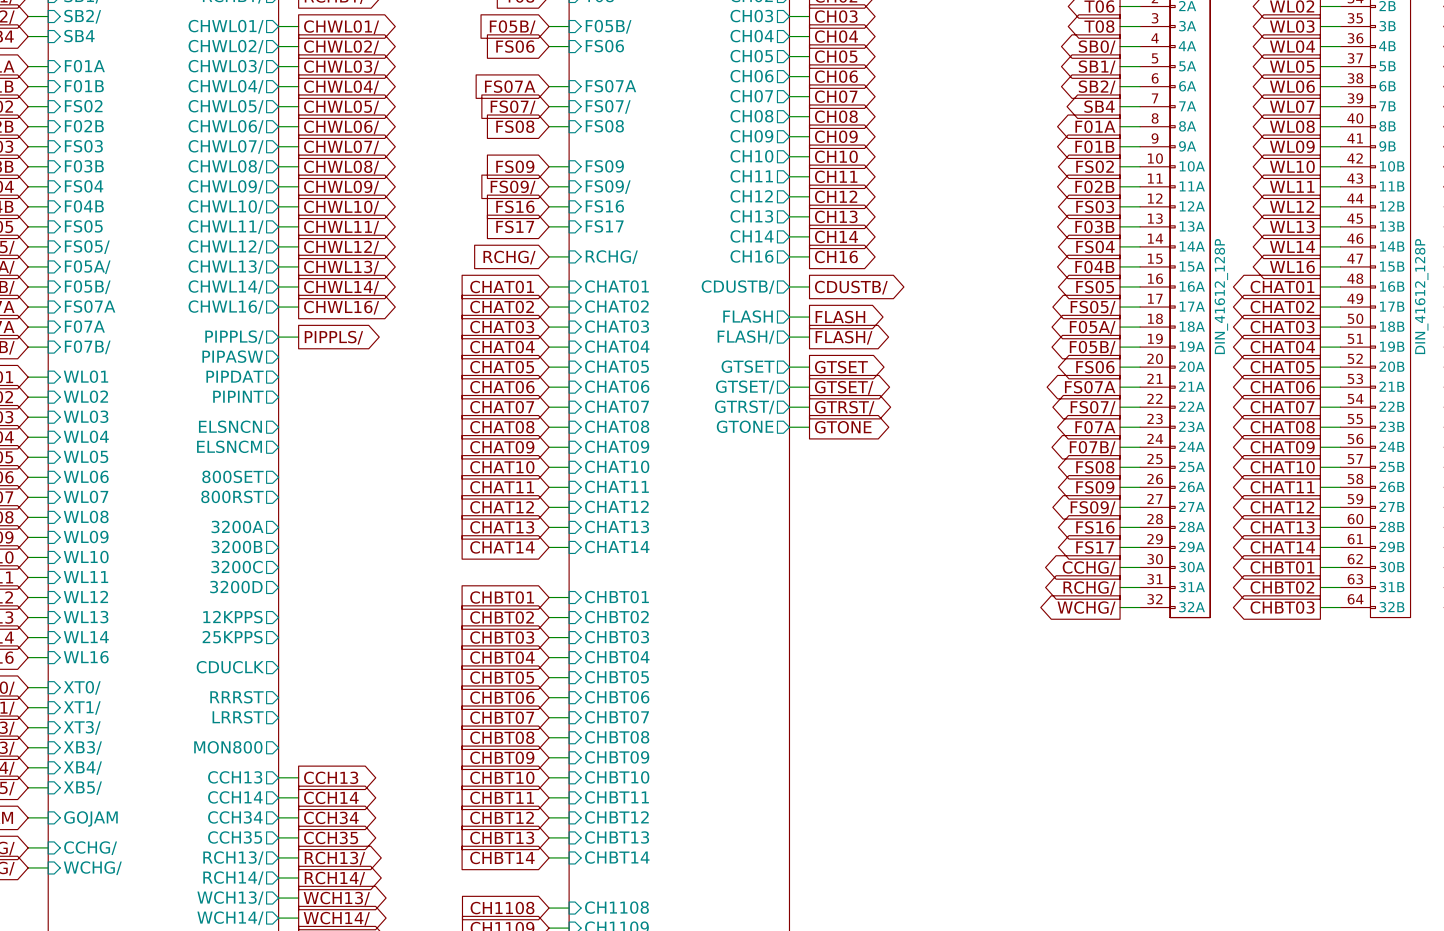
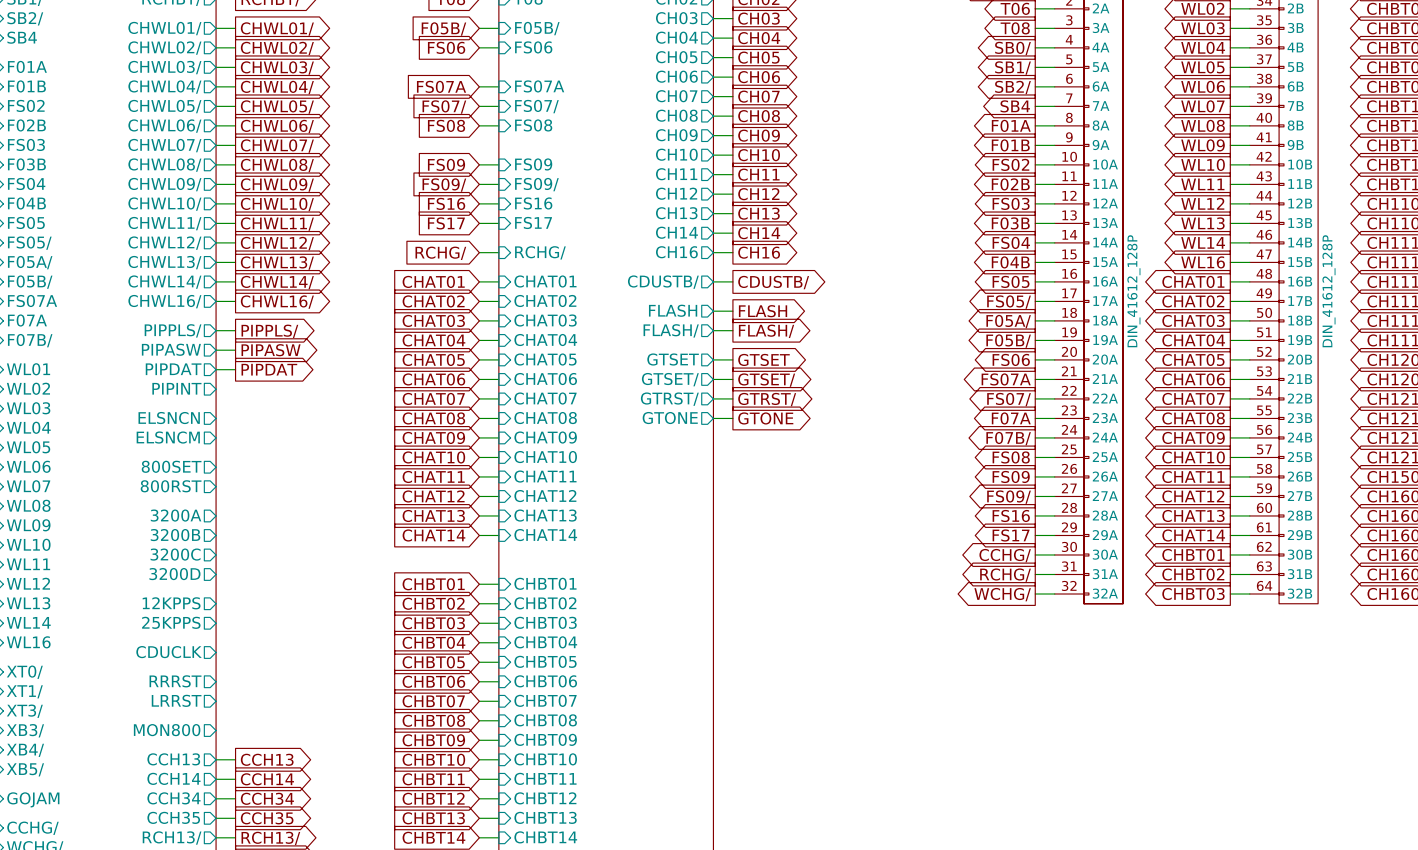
wire: none -> (216, 350) (235, 350)
global label: none -> PIPASW (271, 350)
wire: none -> (216, 369) (235, 369)
global label: none -> PIPDAT (269, 369)

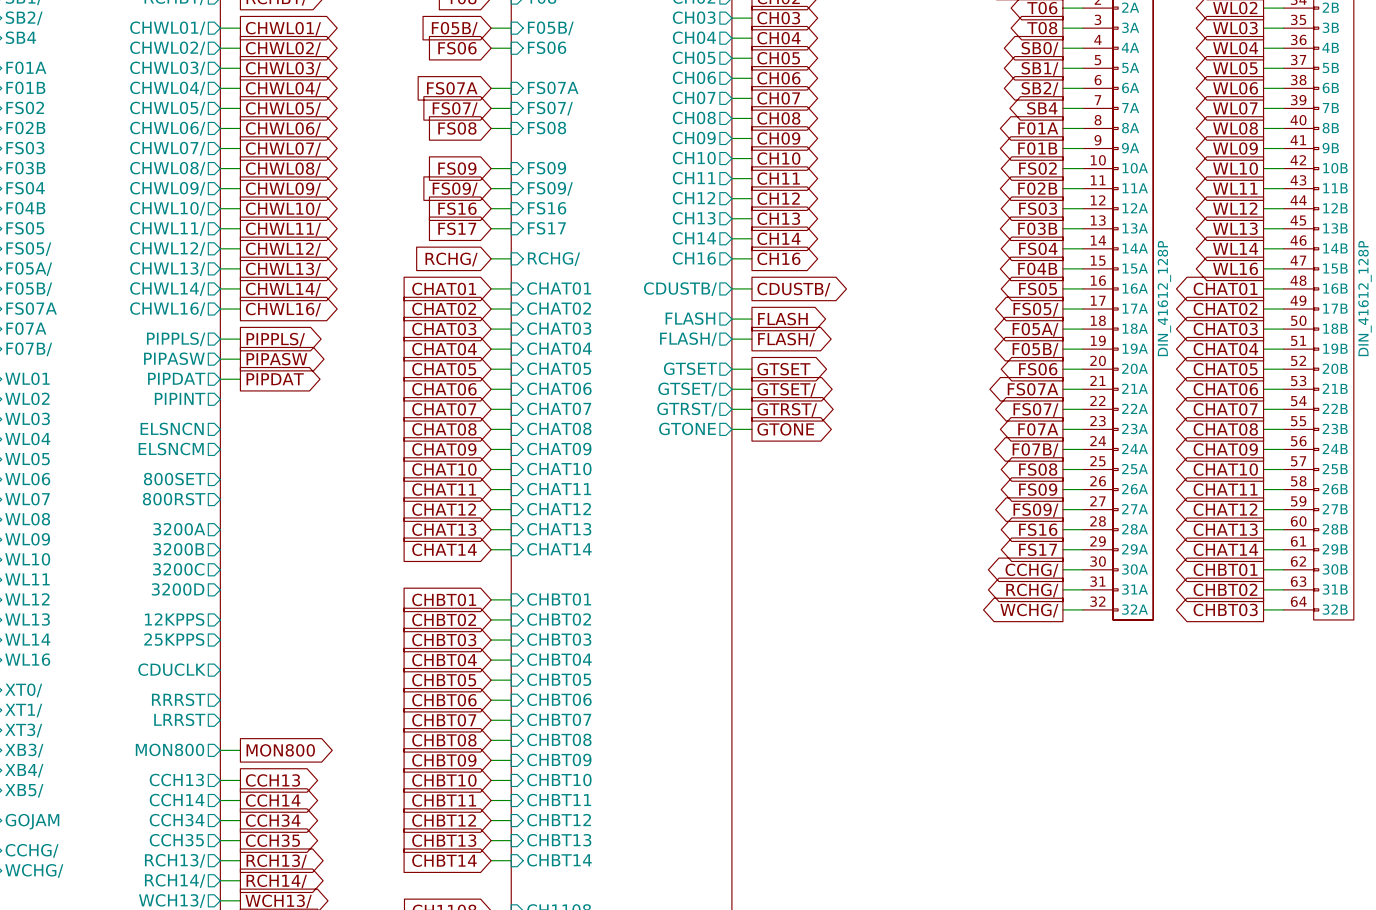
wire: none -> (220, 750) (240, 750)
global label: none -> MON800 (280, 750)

